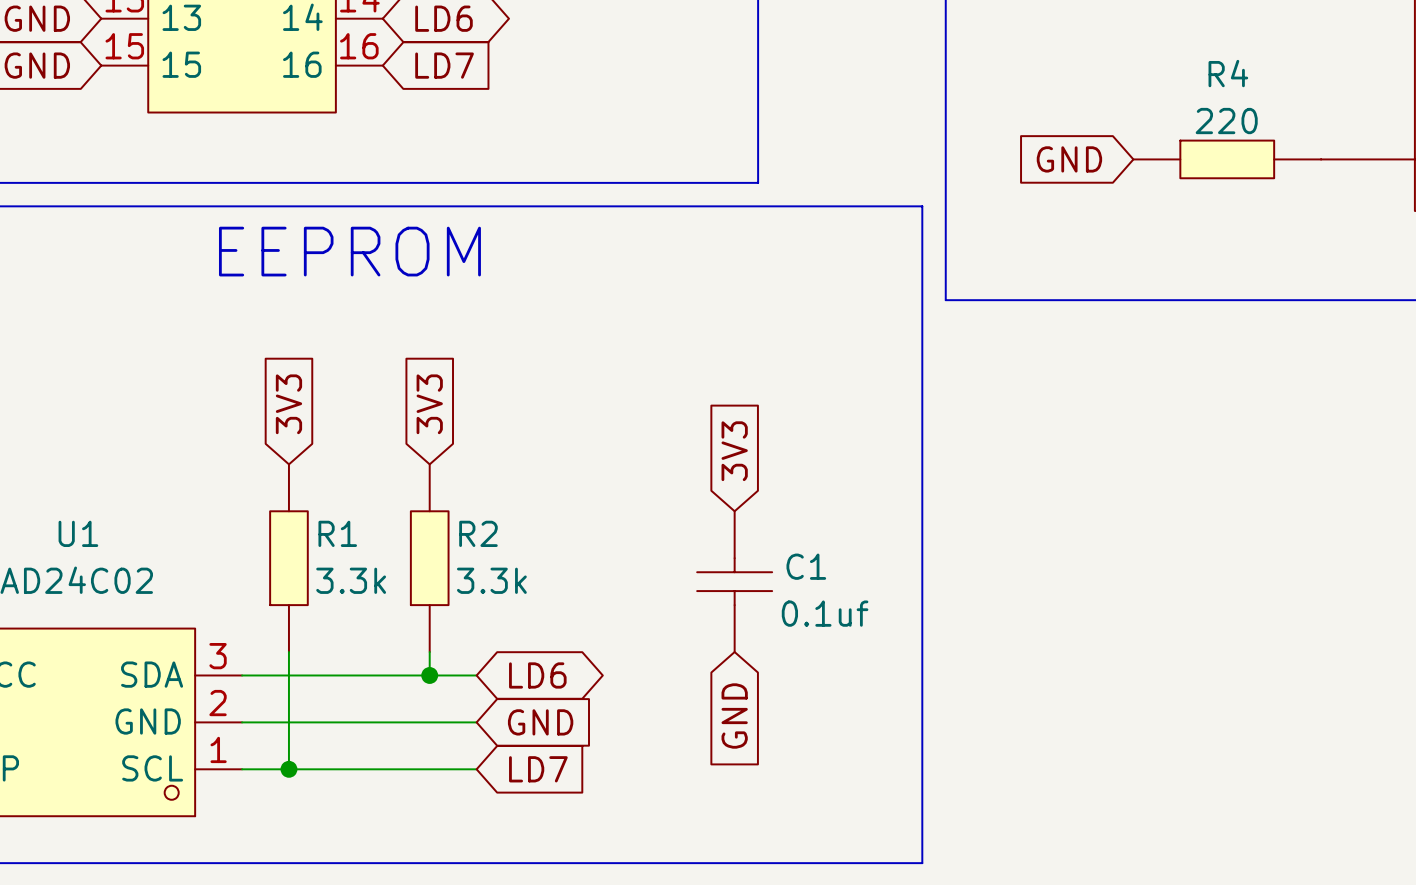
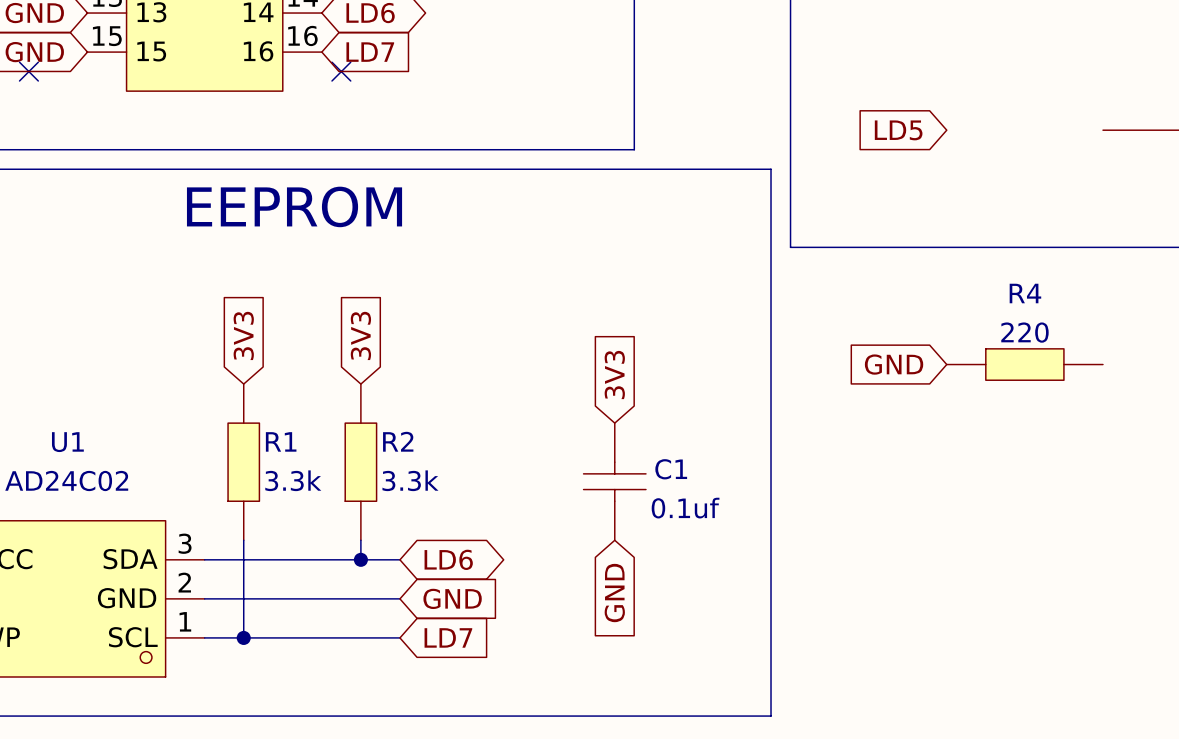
no-connect mark: none -> (28, 71)
no-connect mark: none -> (341, 71)
global label: GND (1069, 159) -> LD5 (898, 130)
R4 position: (1227, 159) -> (1024, 364)
global label: none -> GND (894, 364)

